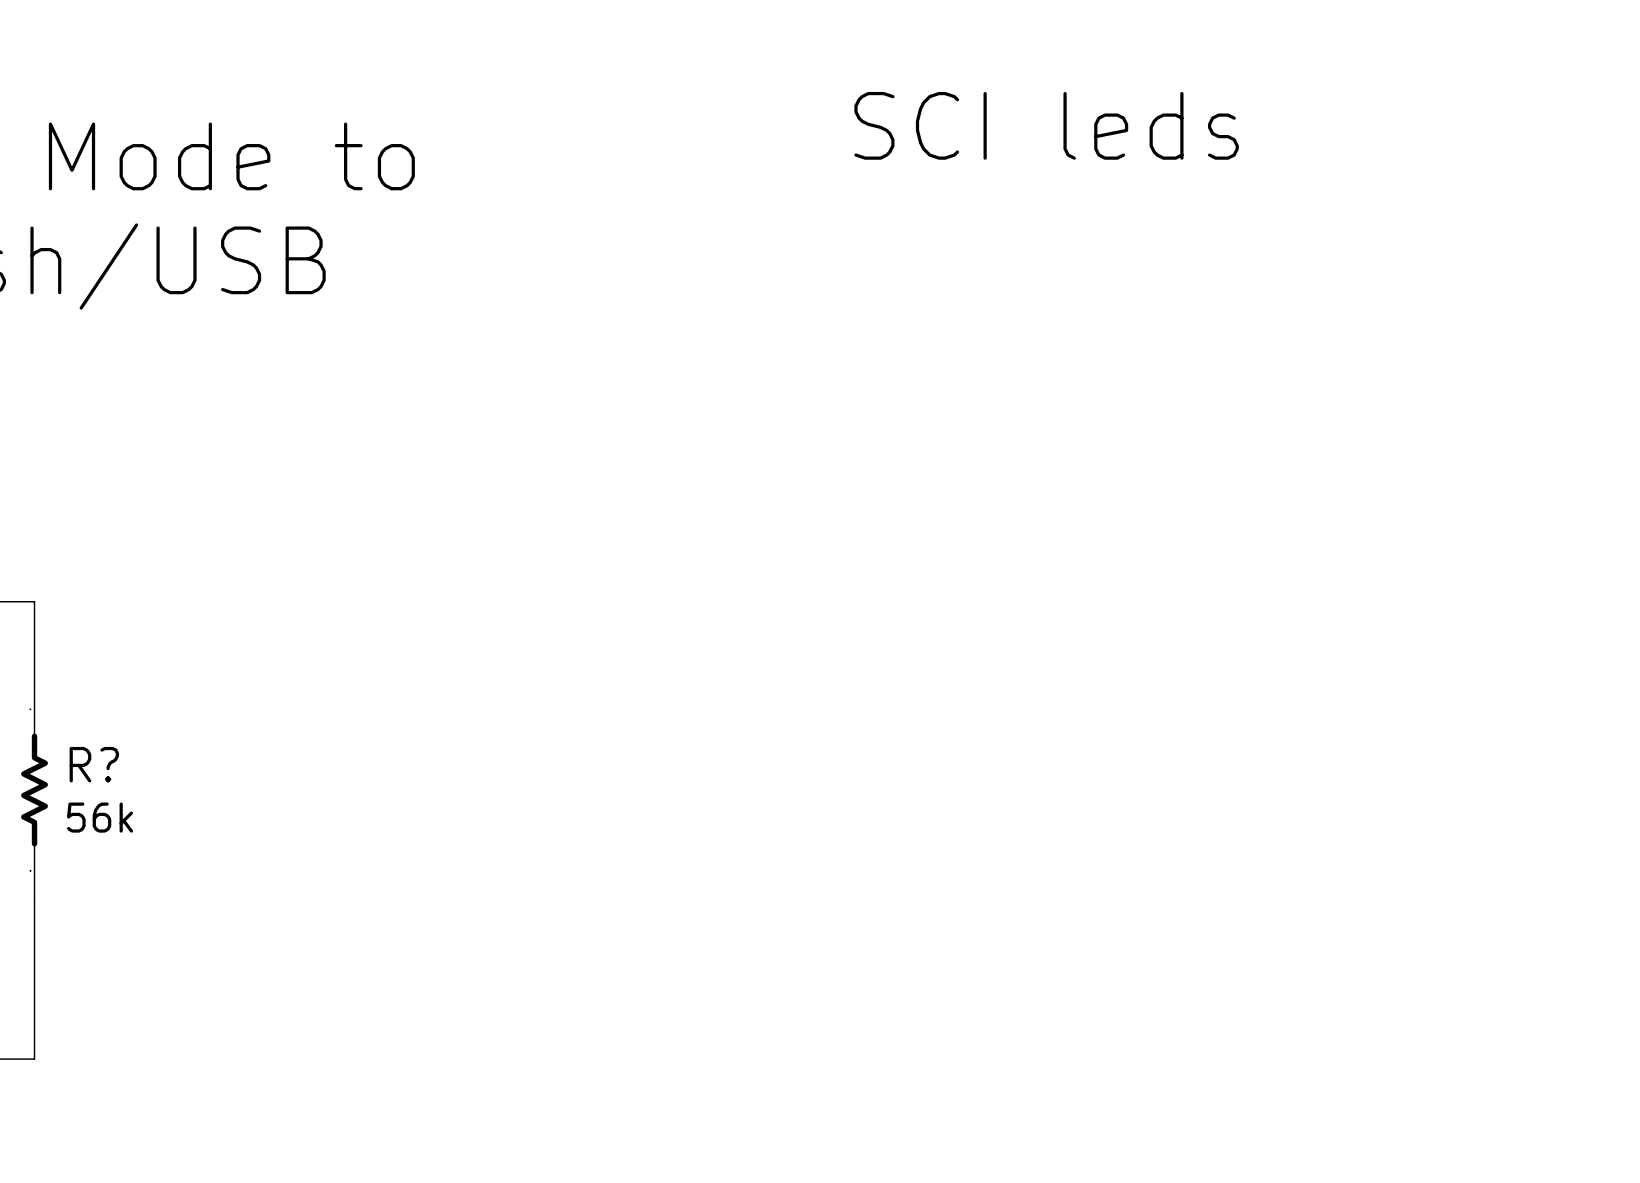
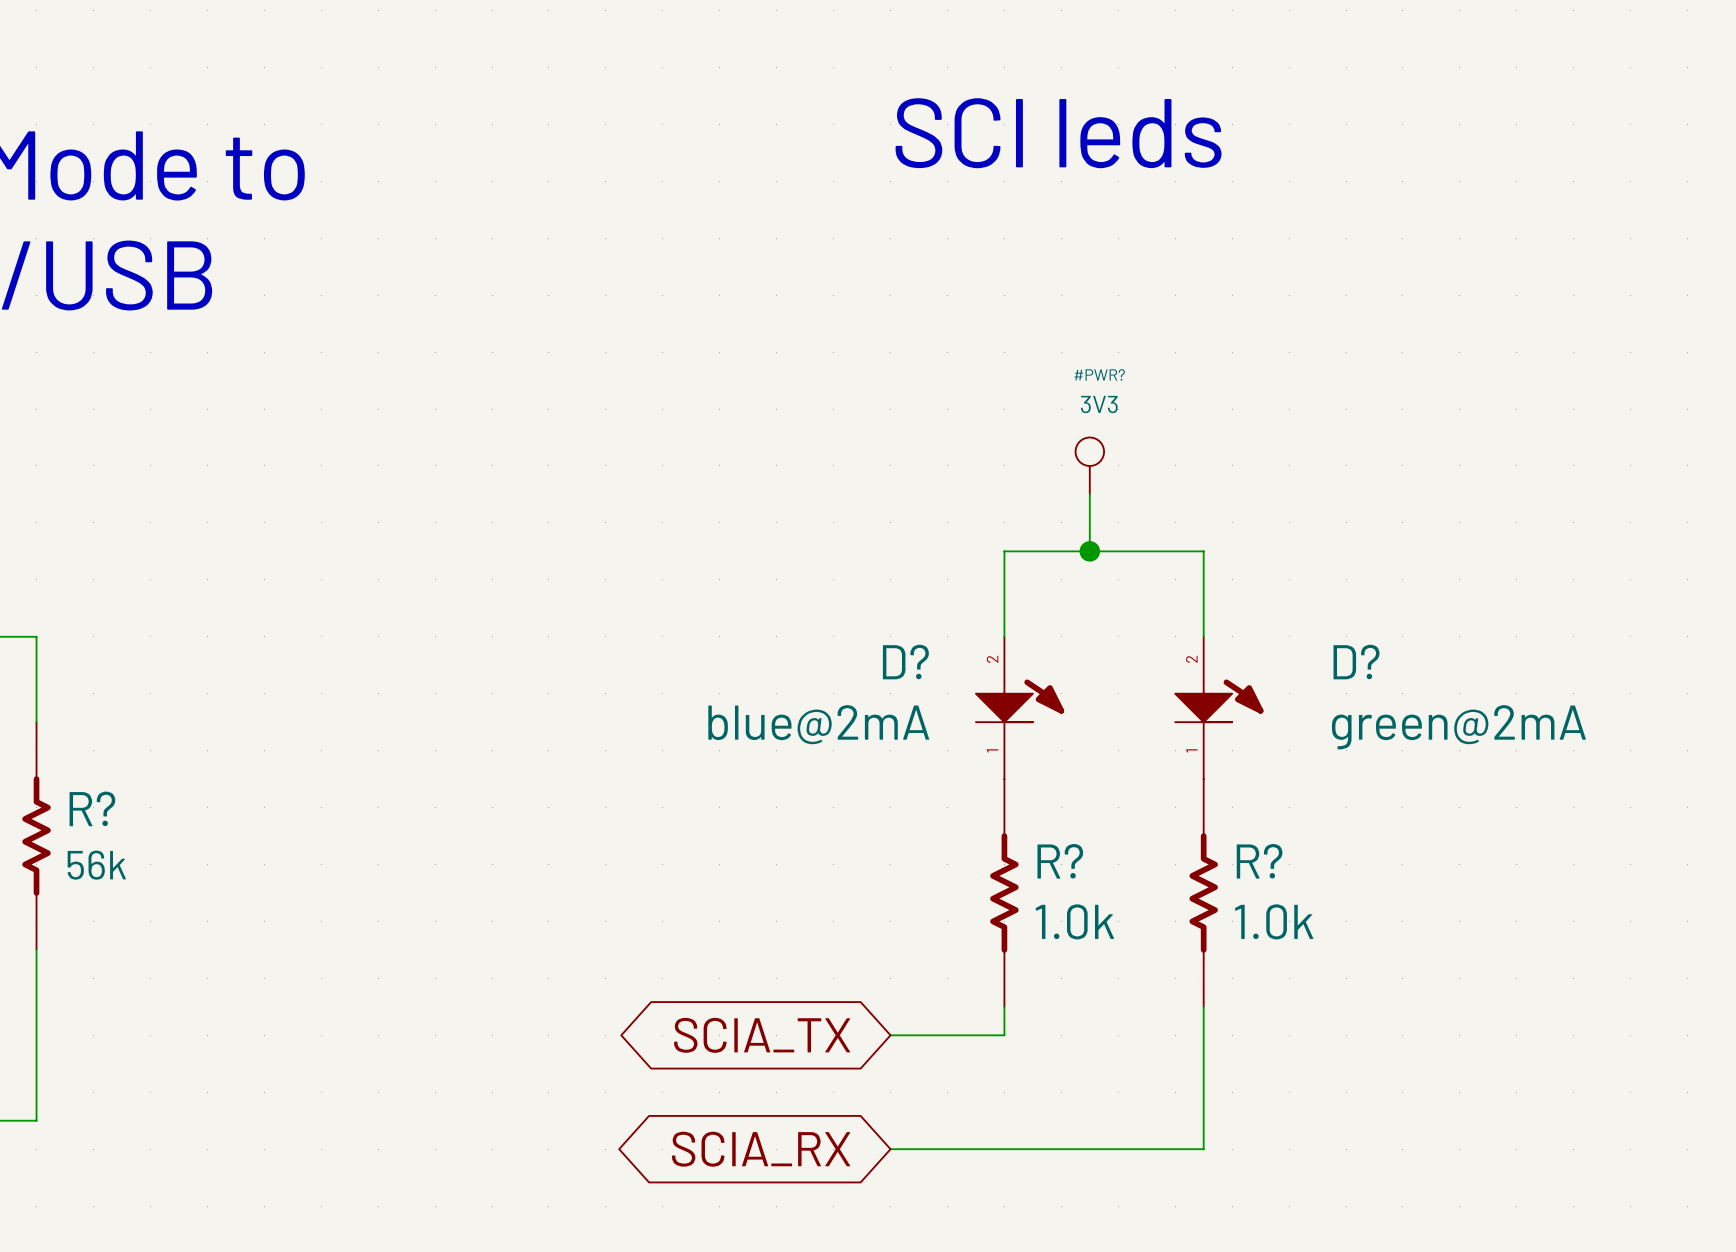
#PWR?: none -> 3V3 (1089, 465)
wire: none -> (1089, 494) (1089, 551)
junction: none -> (1089, 551)
wire: none -> (1004, 636) (1004, 551) (1203, 551) (1203, 636)
D?: none -> (1020, 707)
D?: none -> (1219, 707)
R?: none -> (1004, 892)
R?: none -> (1203, 892)
wire: none -> (1004, 1006) (1004, 1035) (890, 1035)
wire: none -> (1203, 1006) (1203, 1149) (890, 1149)
global label: none -> SCIA_TX (762, 1035)
global label: none -> SCIA_RX (761, 1149)

